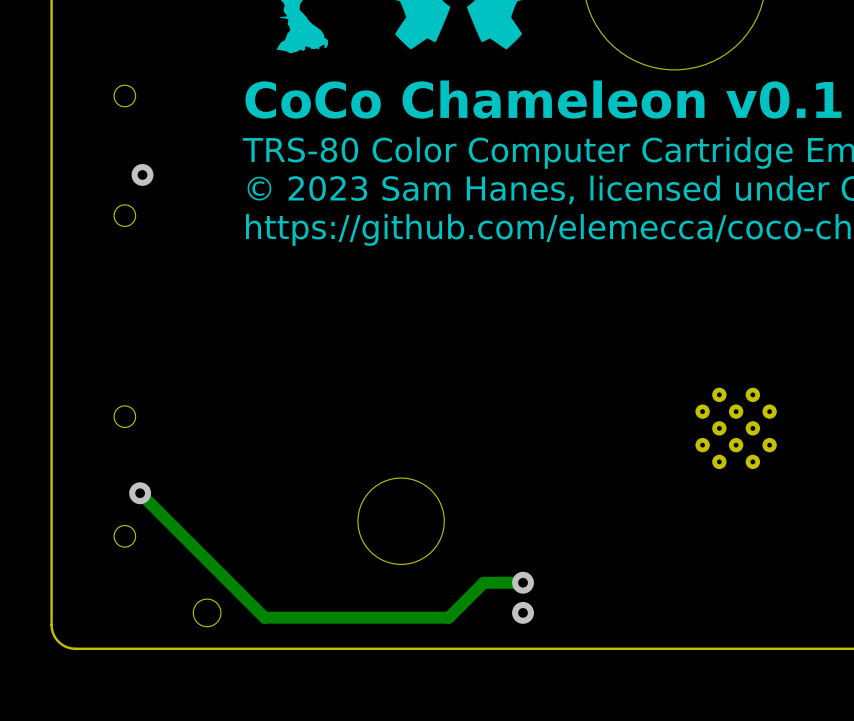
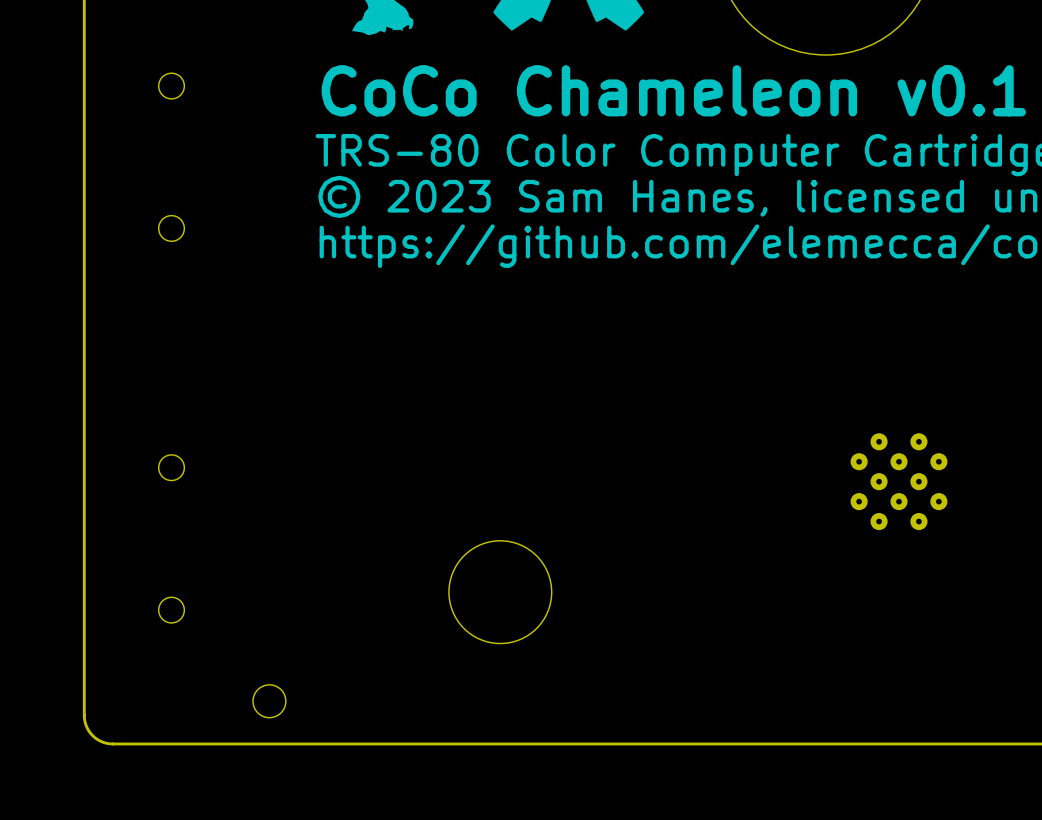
via: (142, 174) -> none
track: (140, 493) (264, 617) (448, 617) (483, 582) (523, 582) -> none
via: (140, 493) -> none
via: (523, 582) -> none
via: (523, 612) -> none

